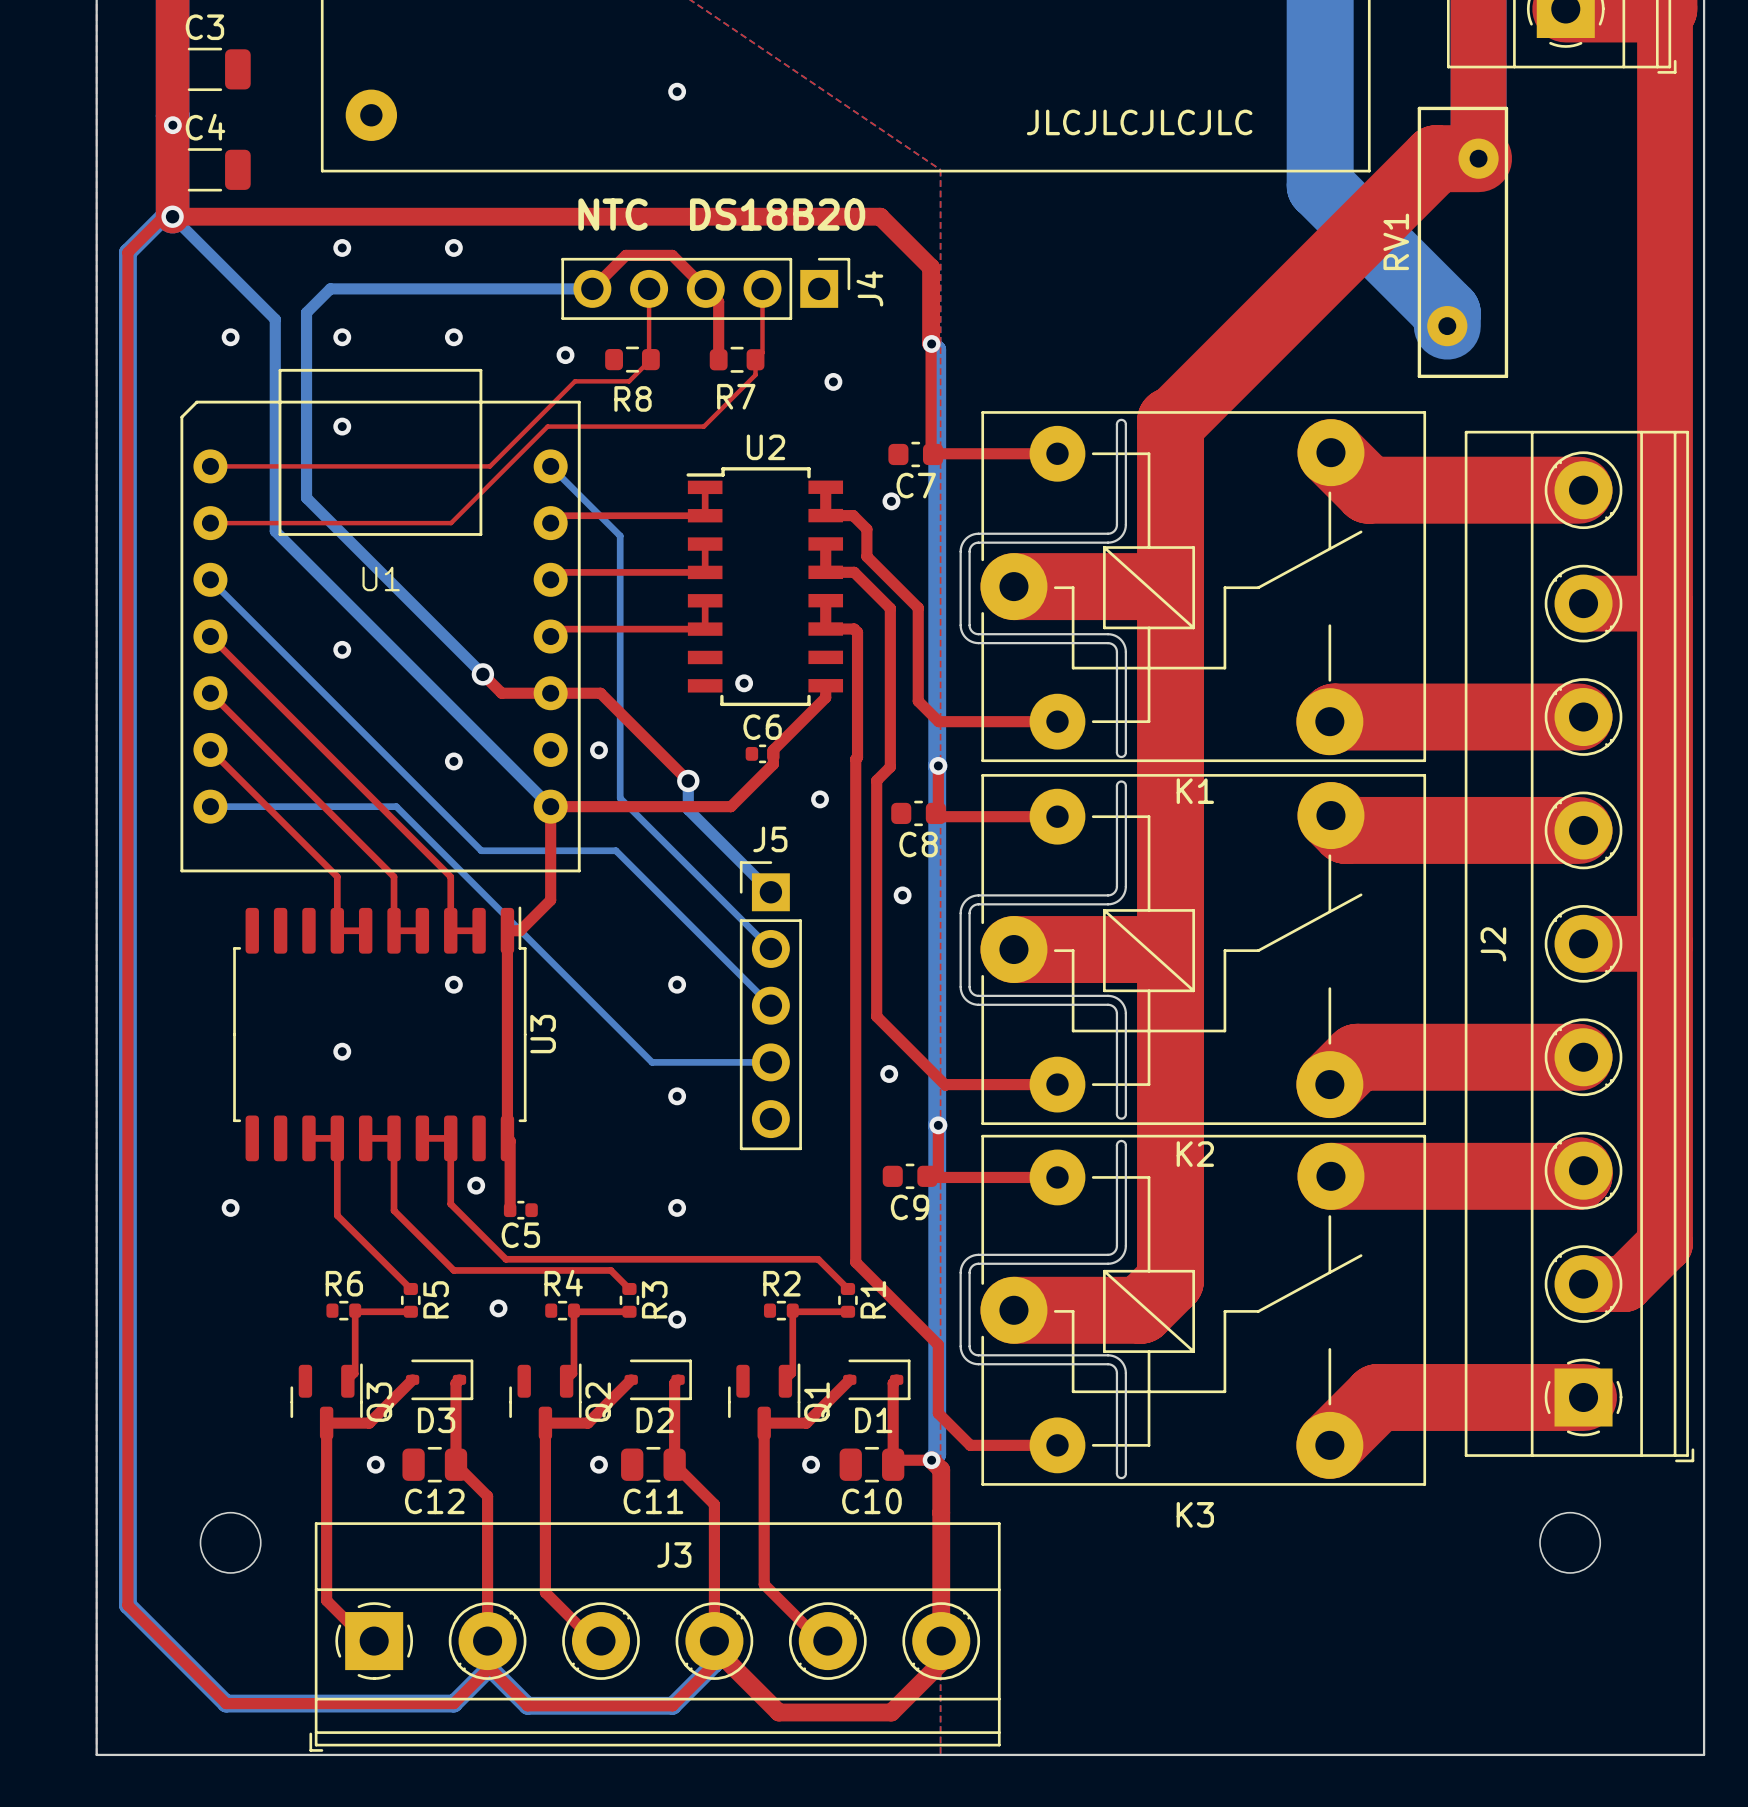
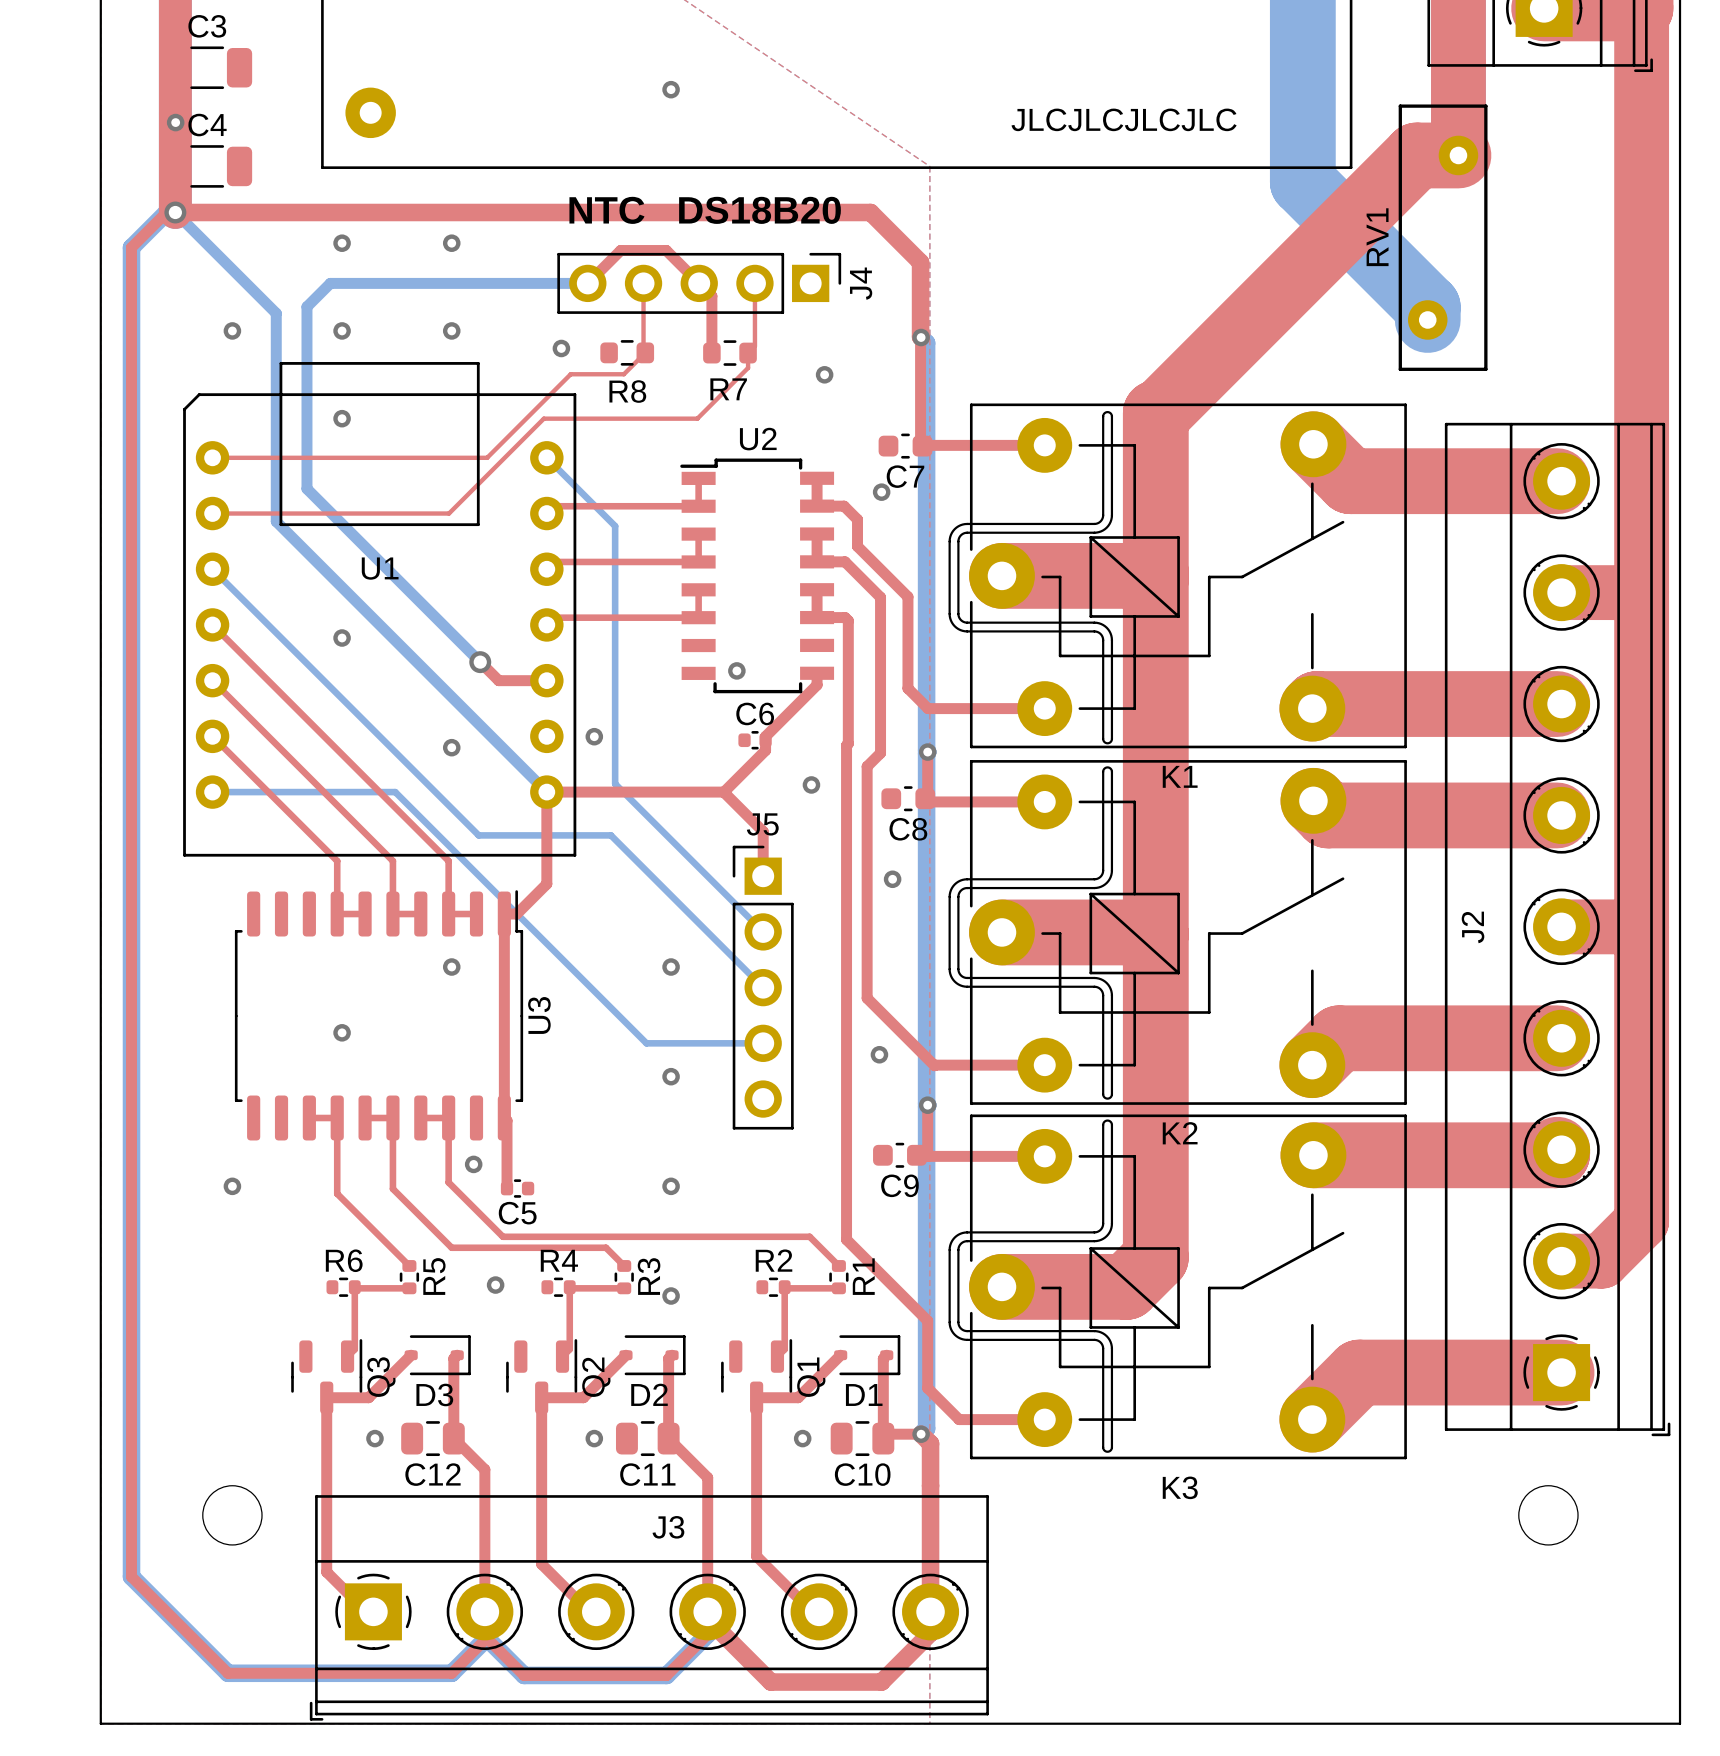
top track: (550, 693) (600, 693) (688, 780) -> none
bottom track: (688, 780) (688, 809) (770, 892) -> none
via: (688, 780) -> none
top track: none -> (723, 792) (763, 831) (763, 876)

